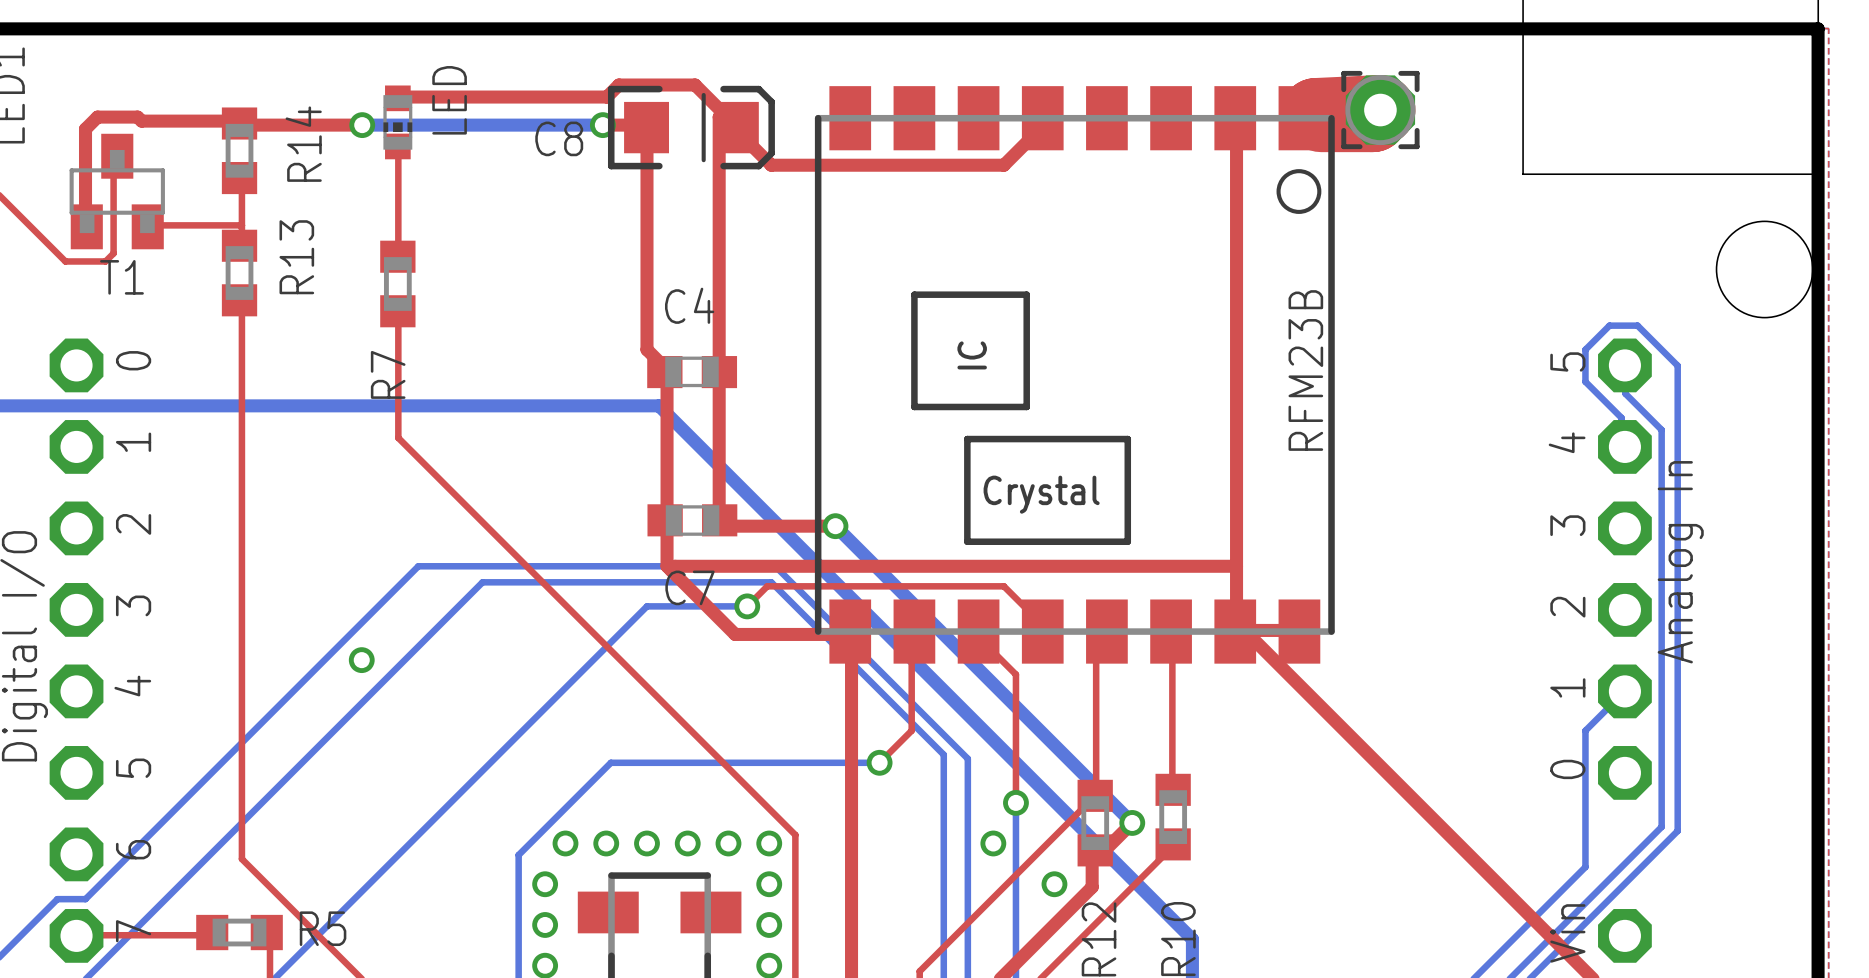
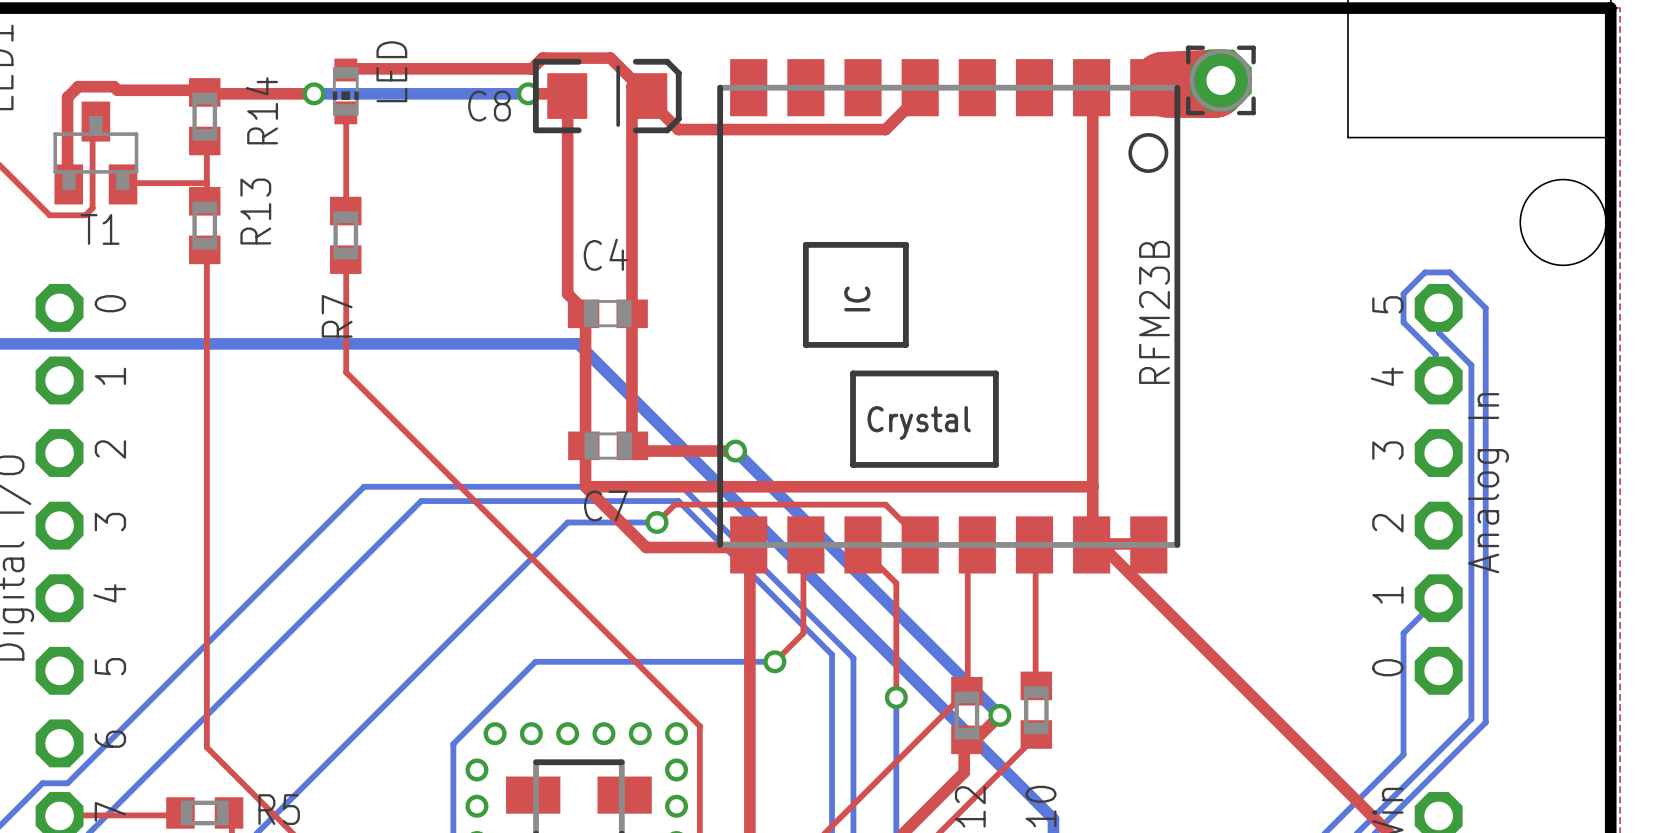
via: (361, 660) -> none
via: (993, 843) -> none
via: (1054, 884) -> none

